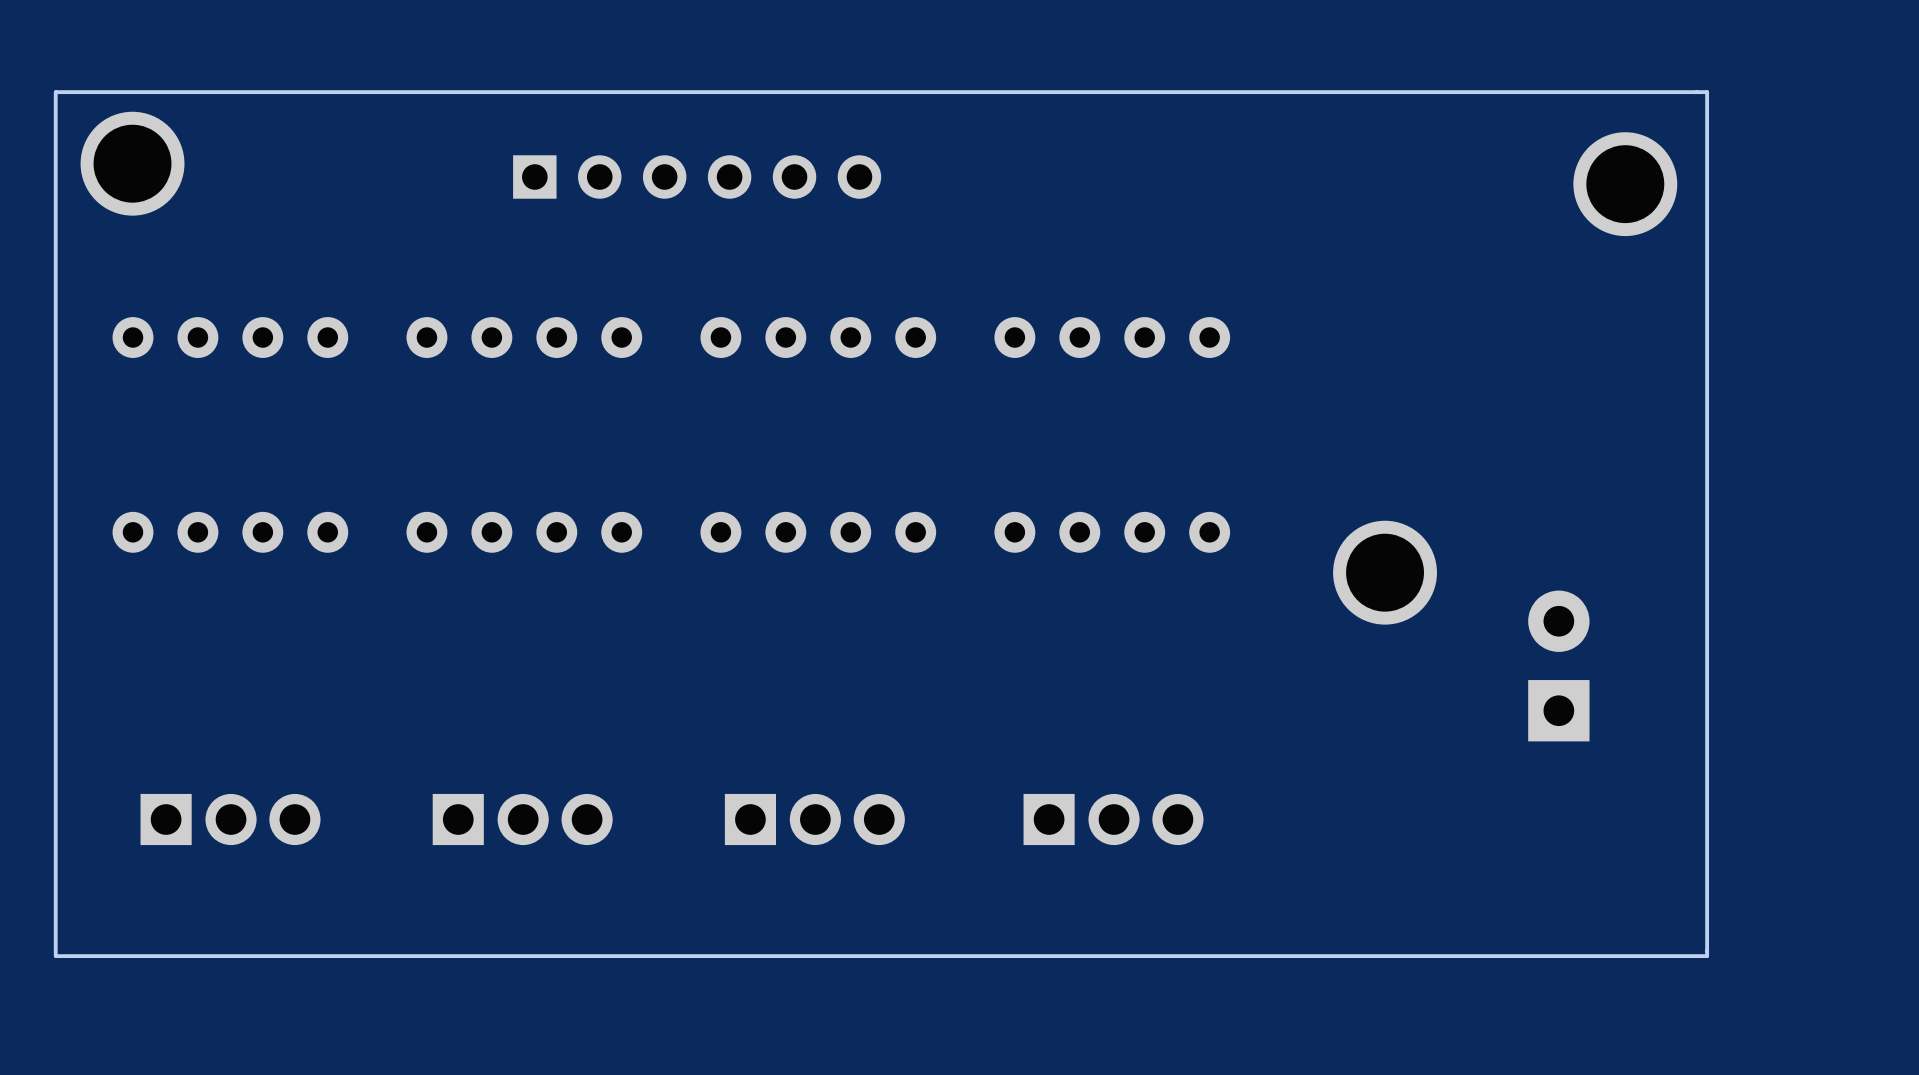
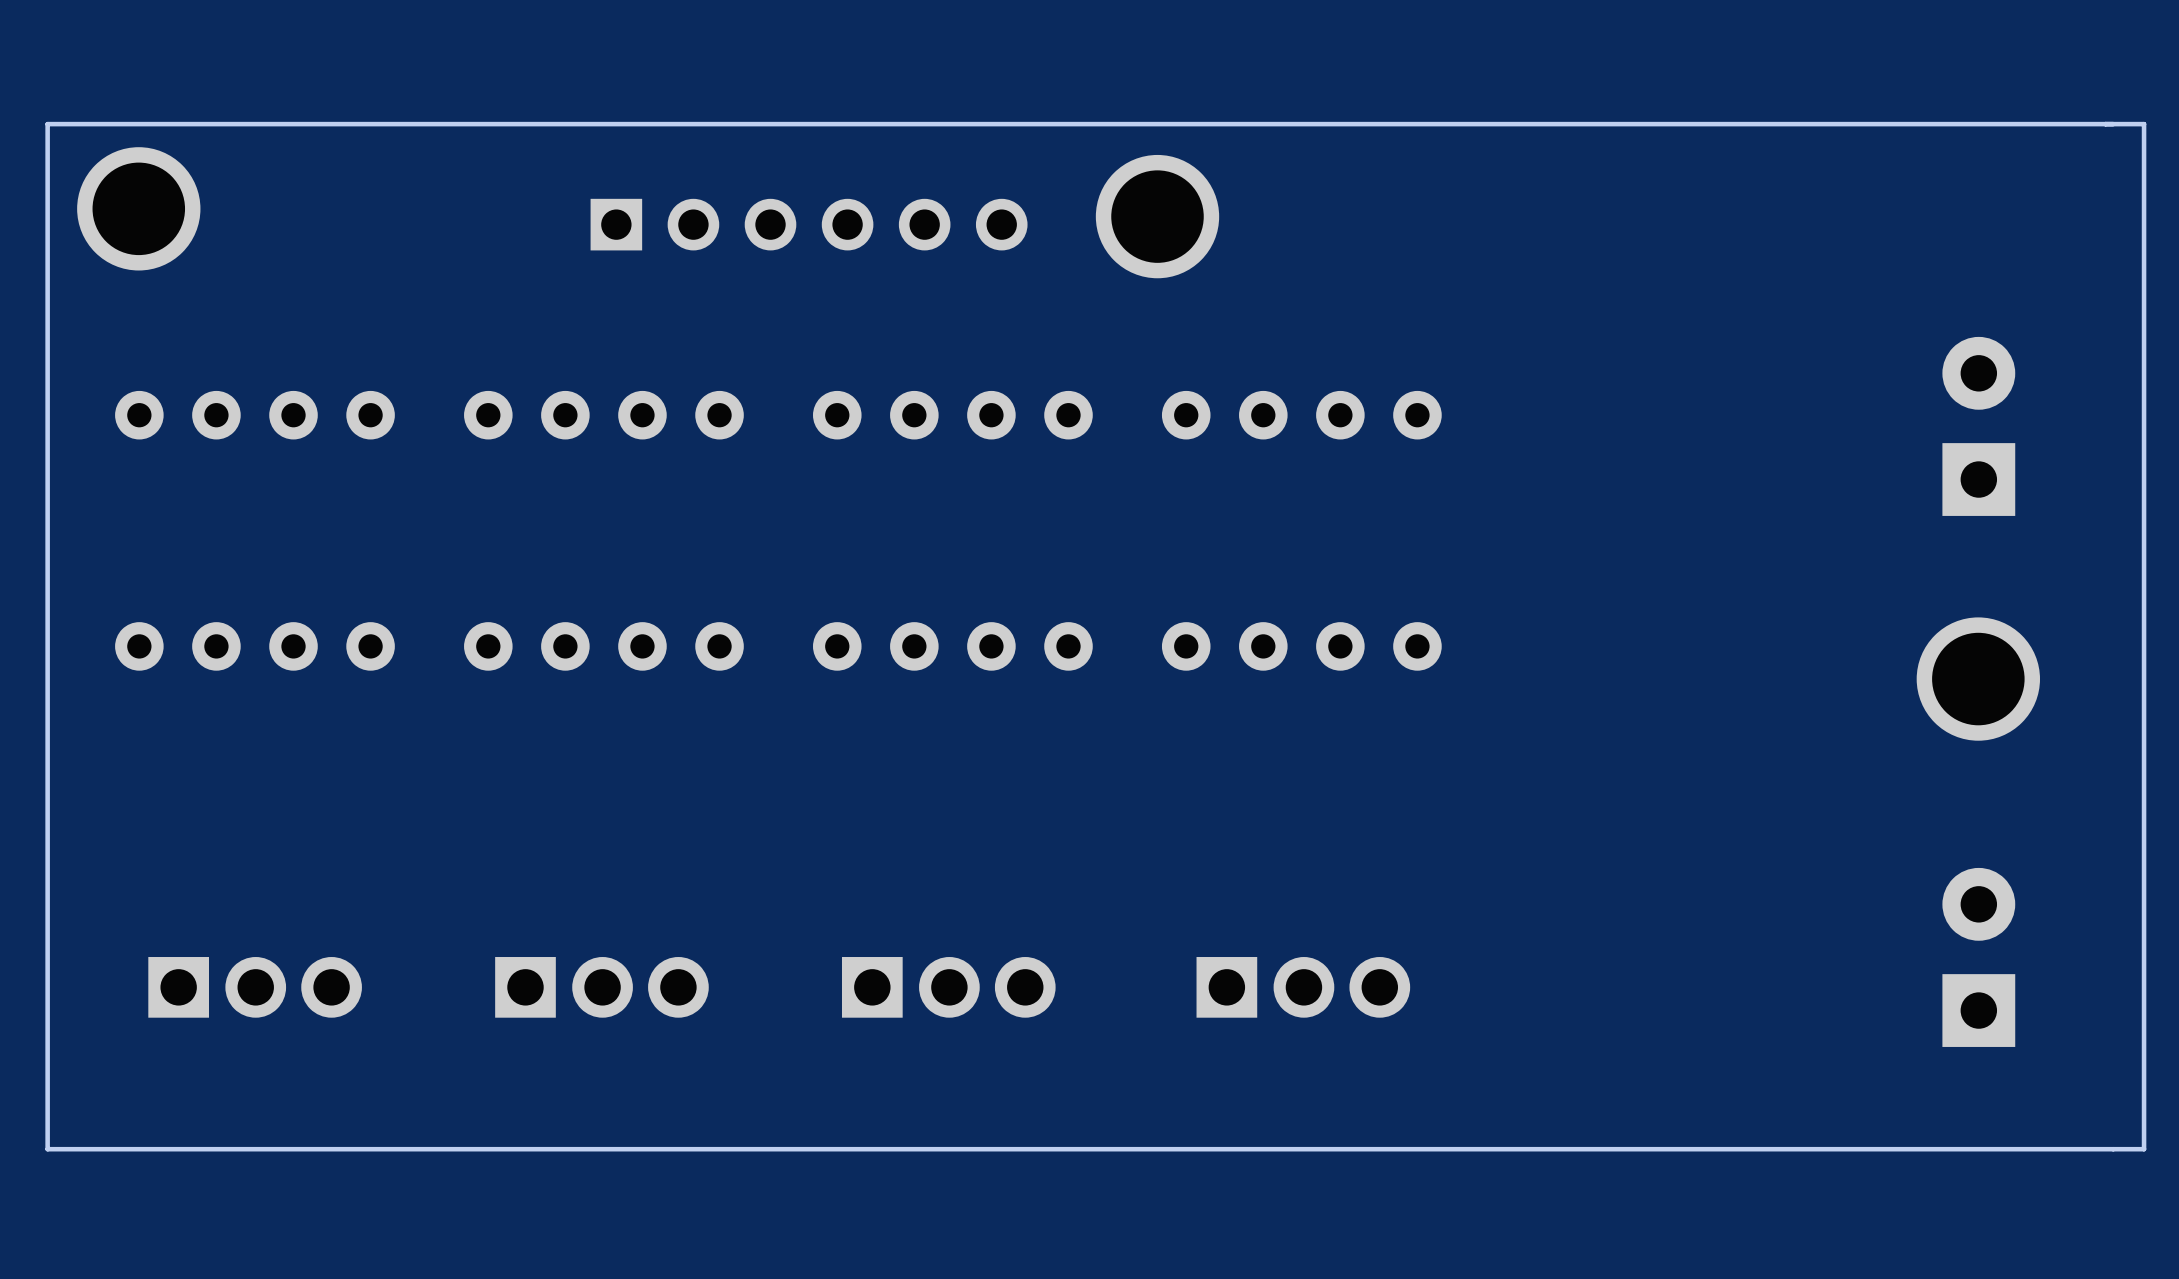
board edge: (55, 92) (1707, 92) (1707, 956) (55, 956) -> (47, 124) (2144, 124) (2144, 1149) (47, 1149)
part: none -> (1157, 216)
part: (1625, 184) -> none
part: none -> (1978, 426)
part: none -> (1978, 679)
part: (1385, 572) -> none
part: (1558, 665) -> none
part: none -> (1978, 957)

